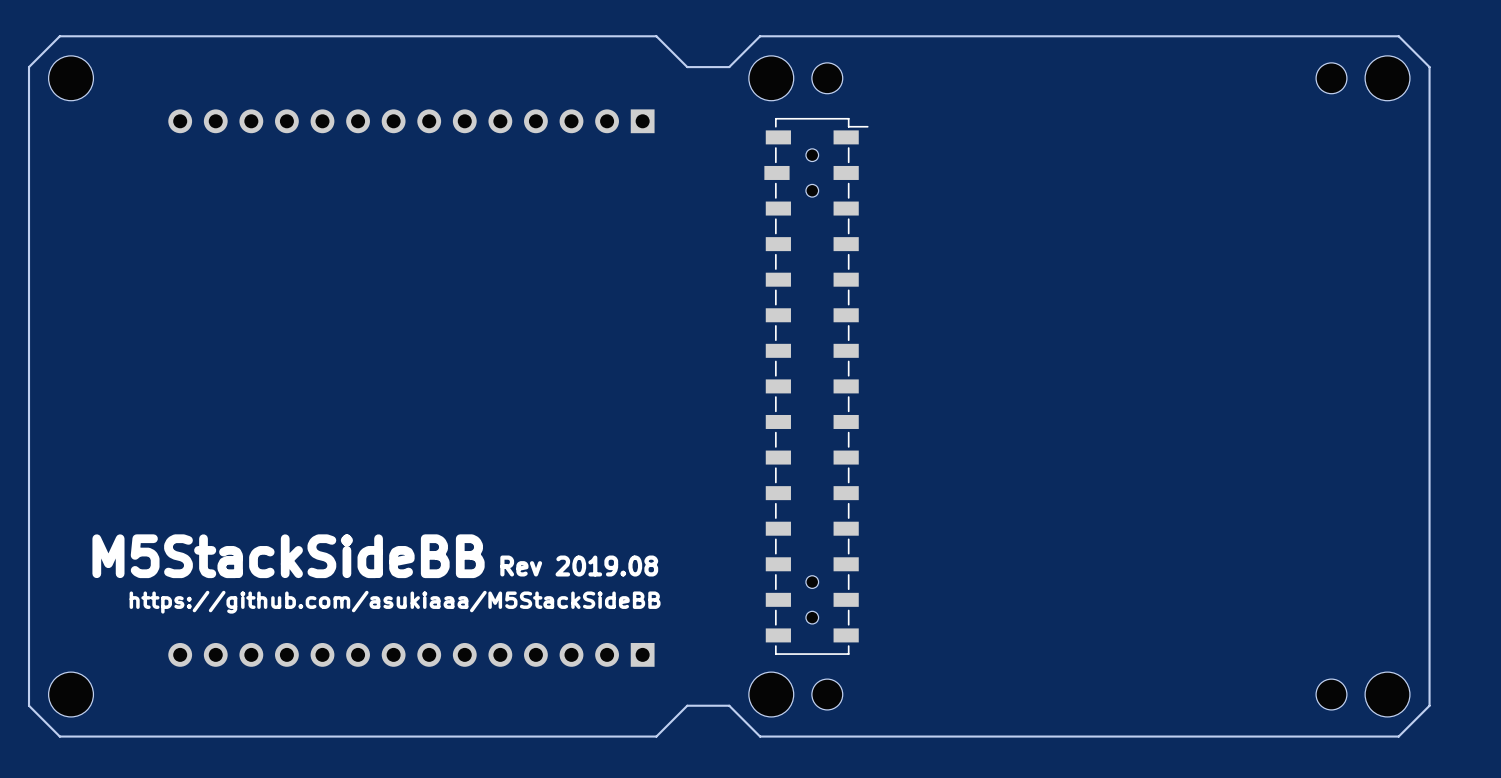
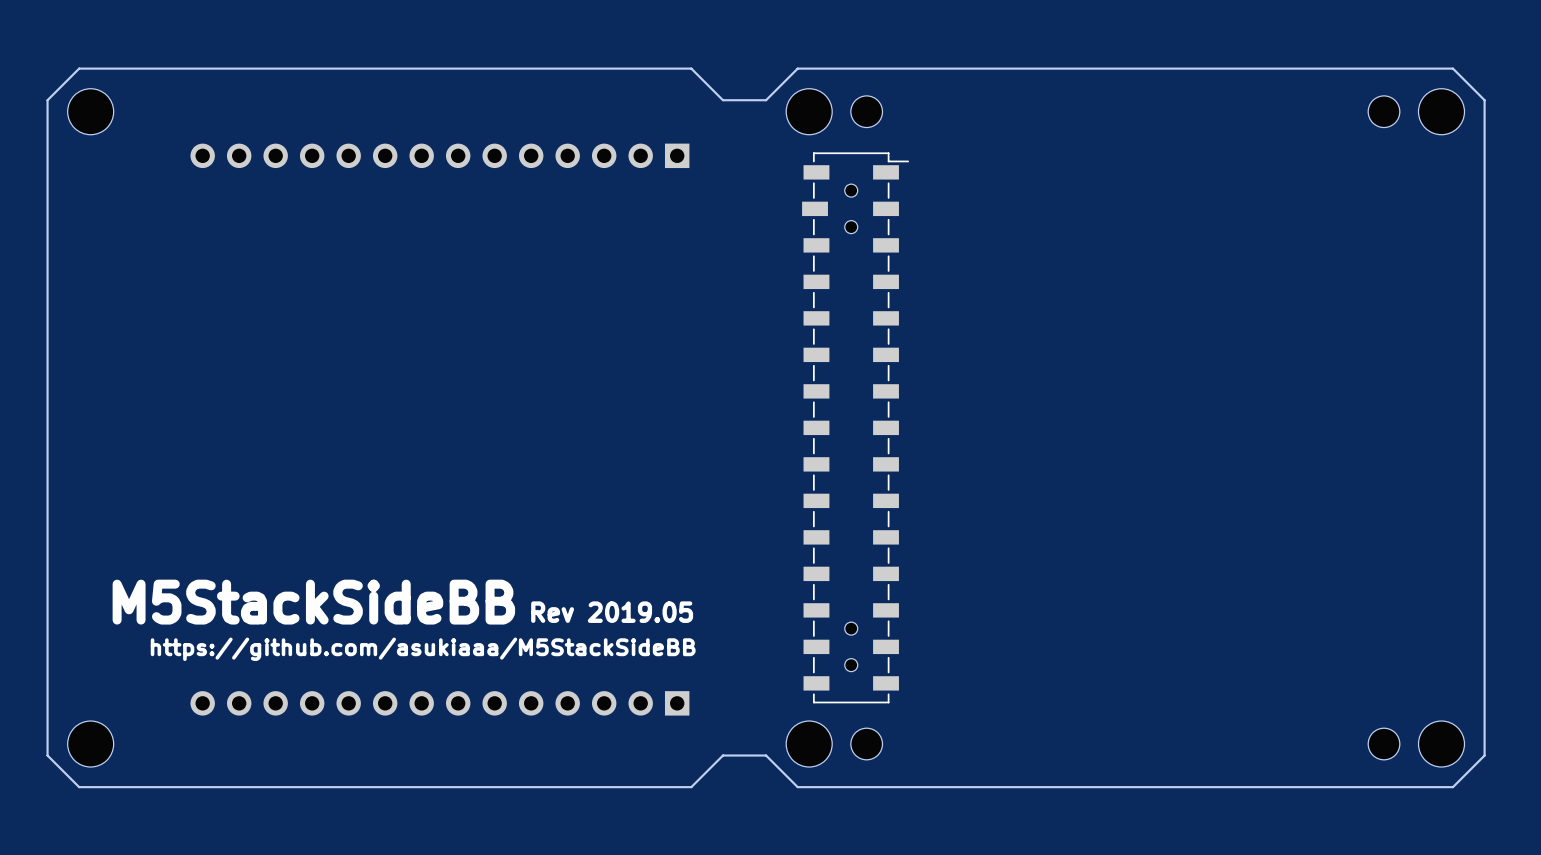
text: Rev 2019.08 (579, 566) -> Rev 2019.05 (612, 612)

